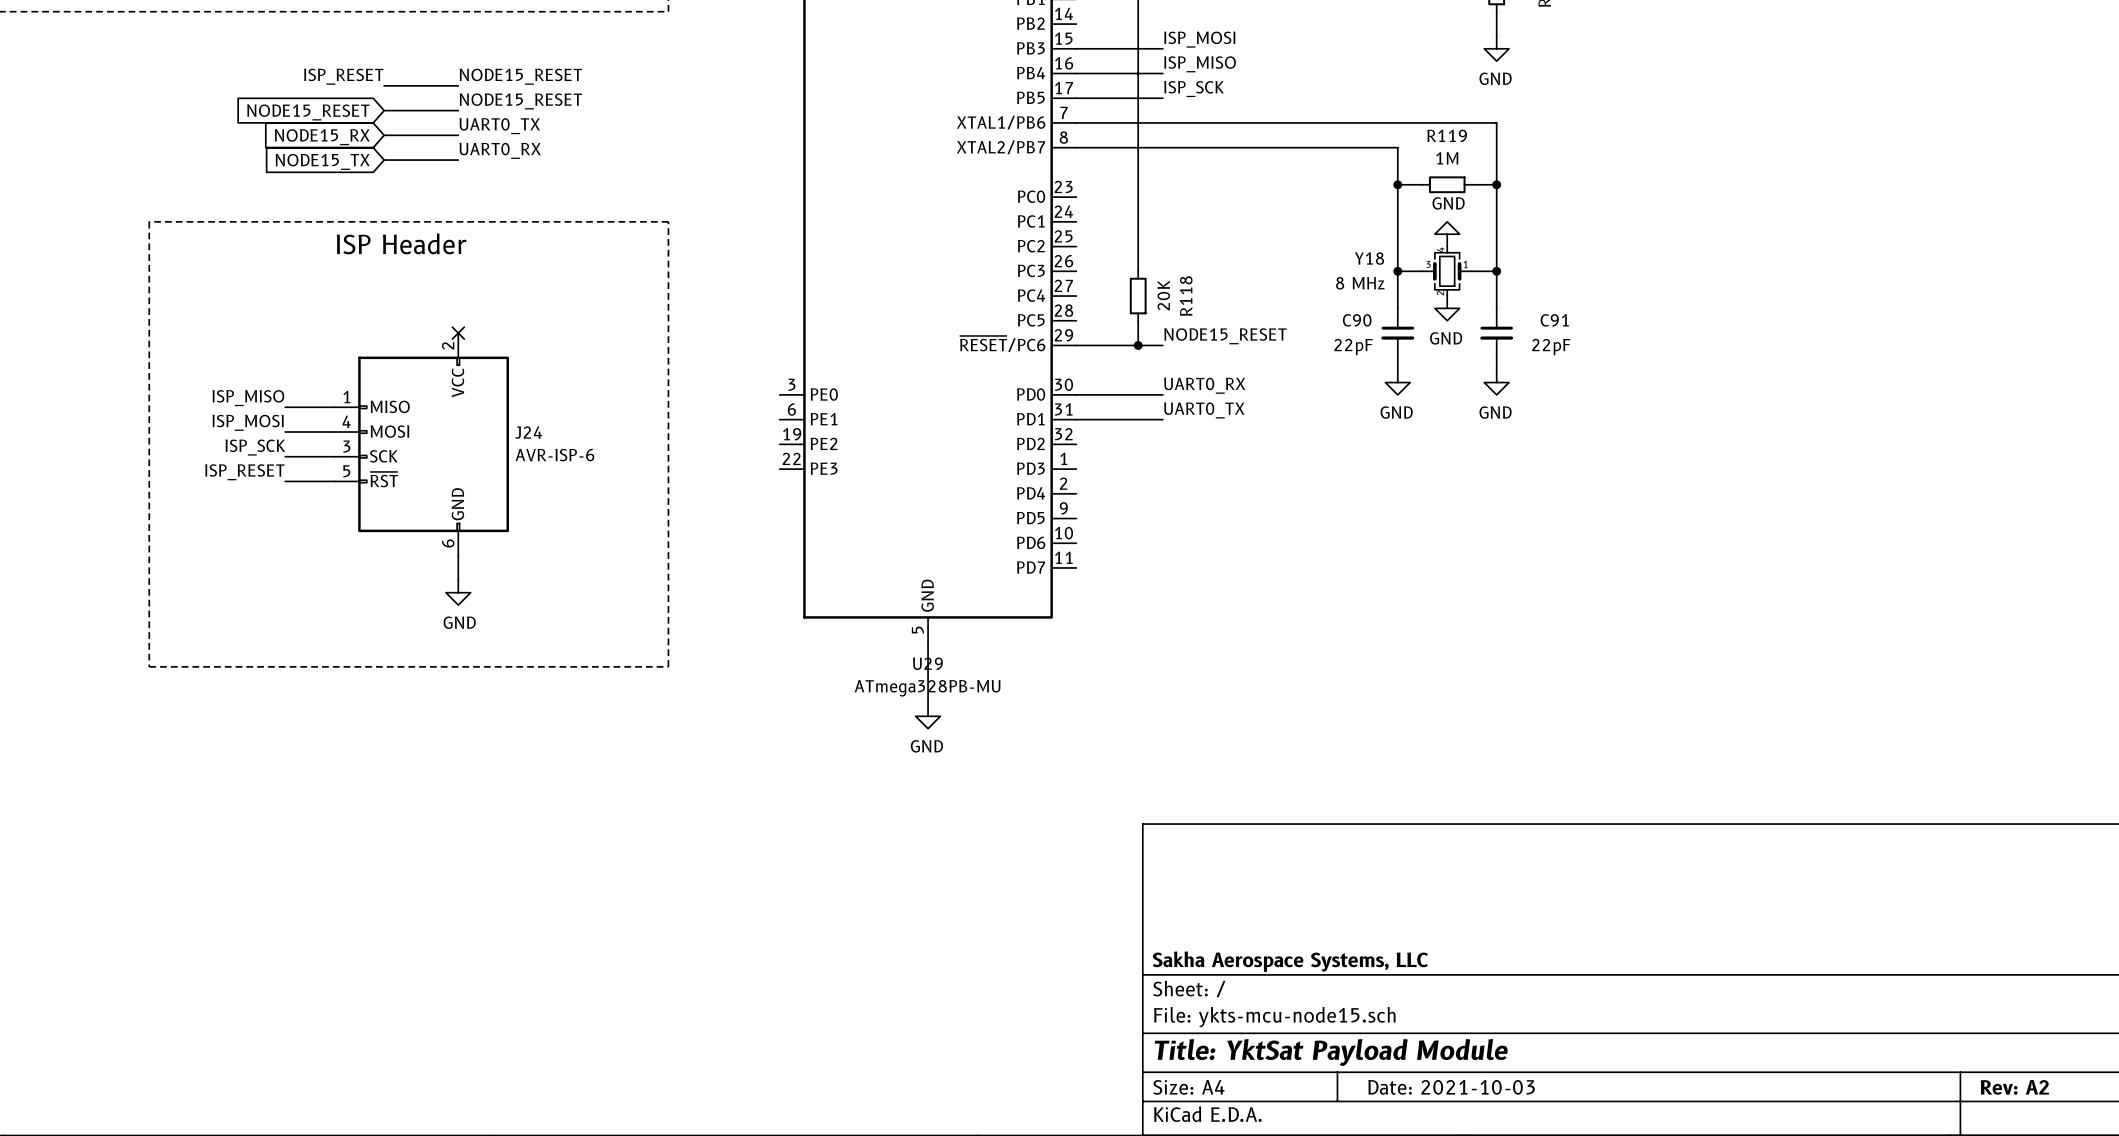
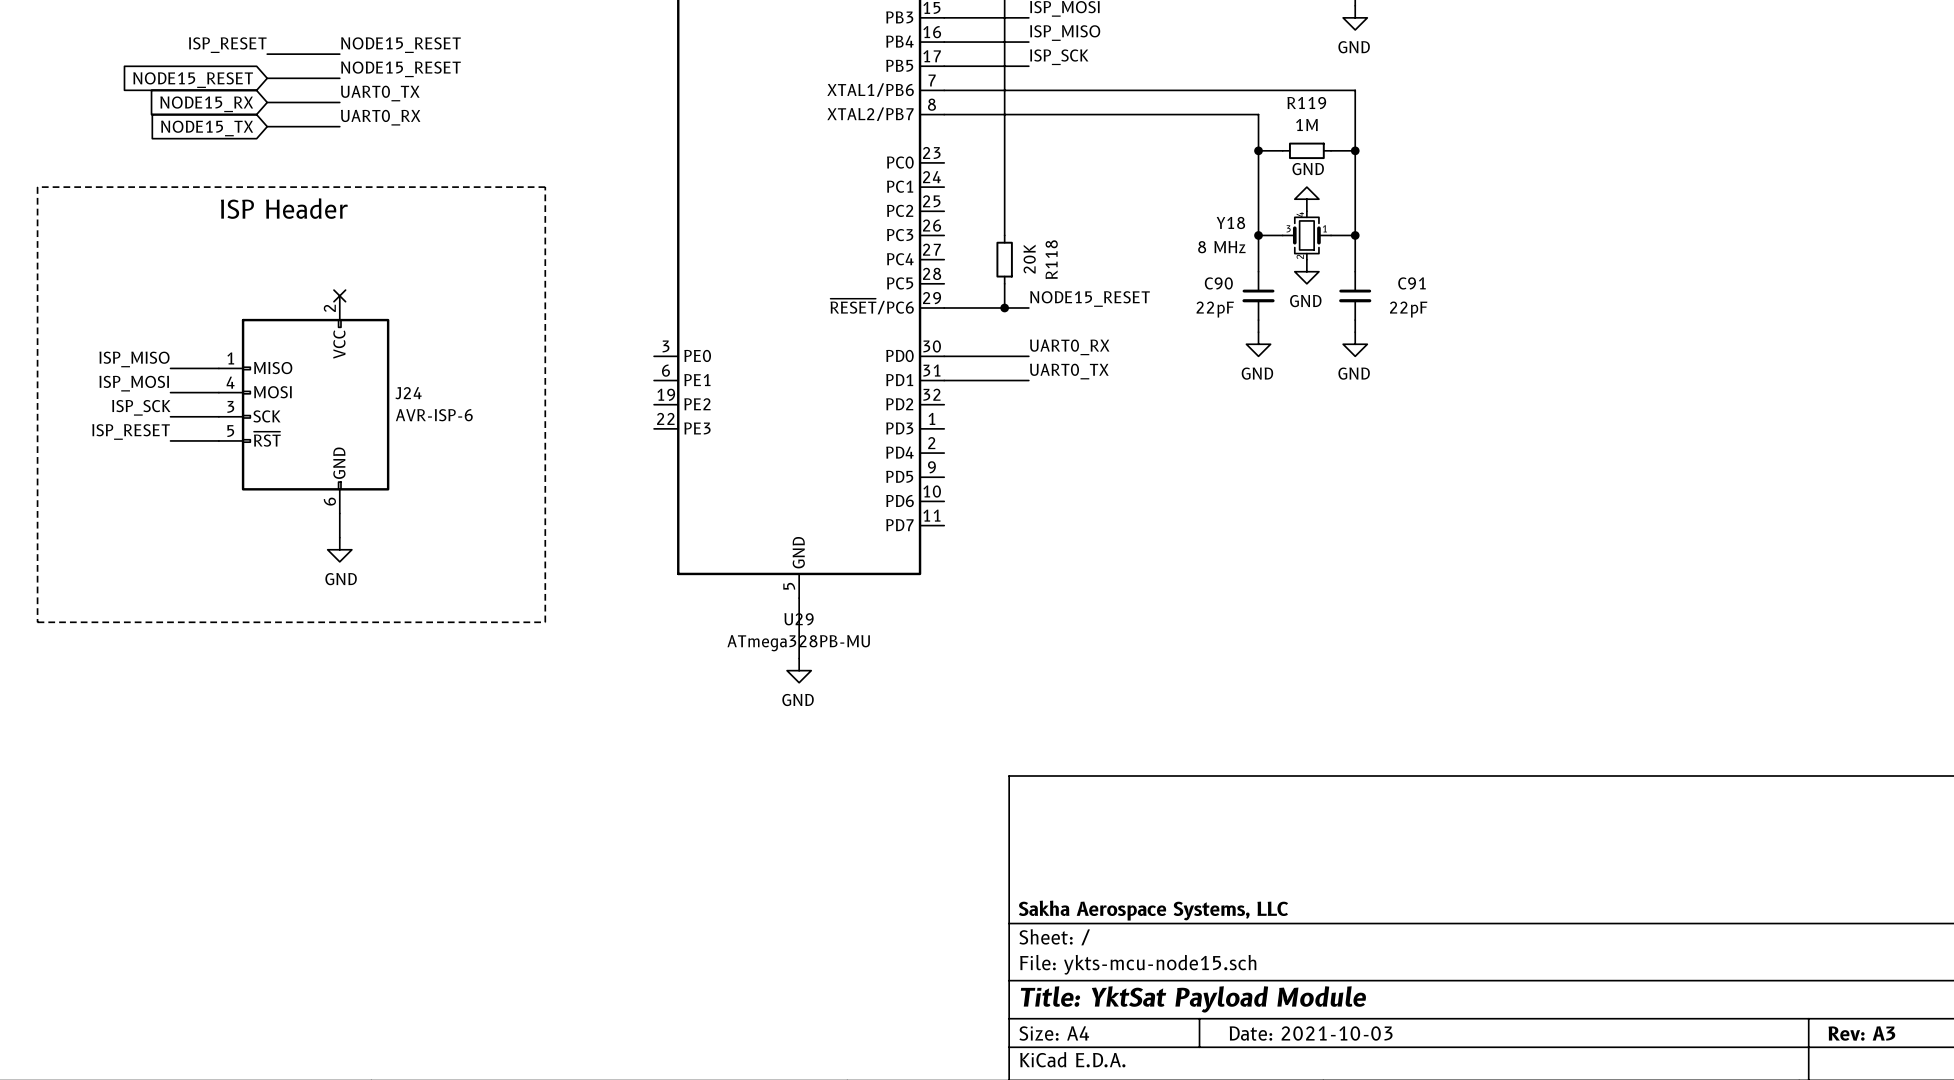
title block: Rev: A2 (2014, 1087) -> Rev: A3 (1861, 1033)

